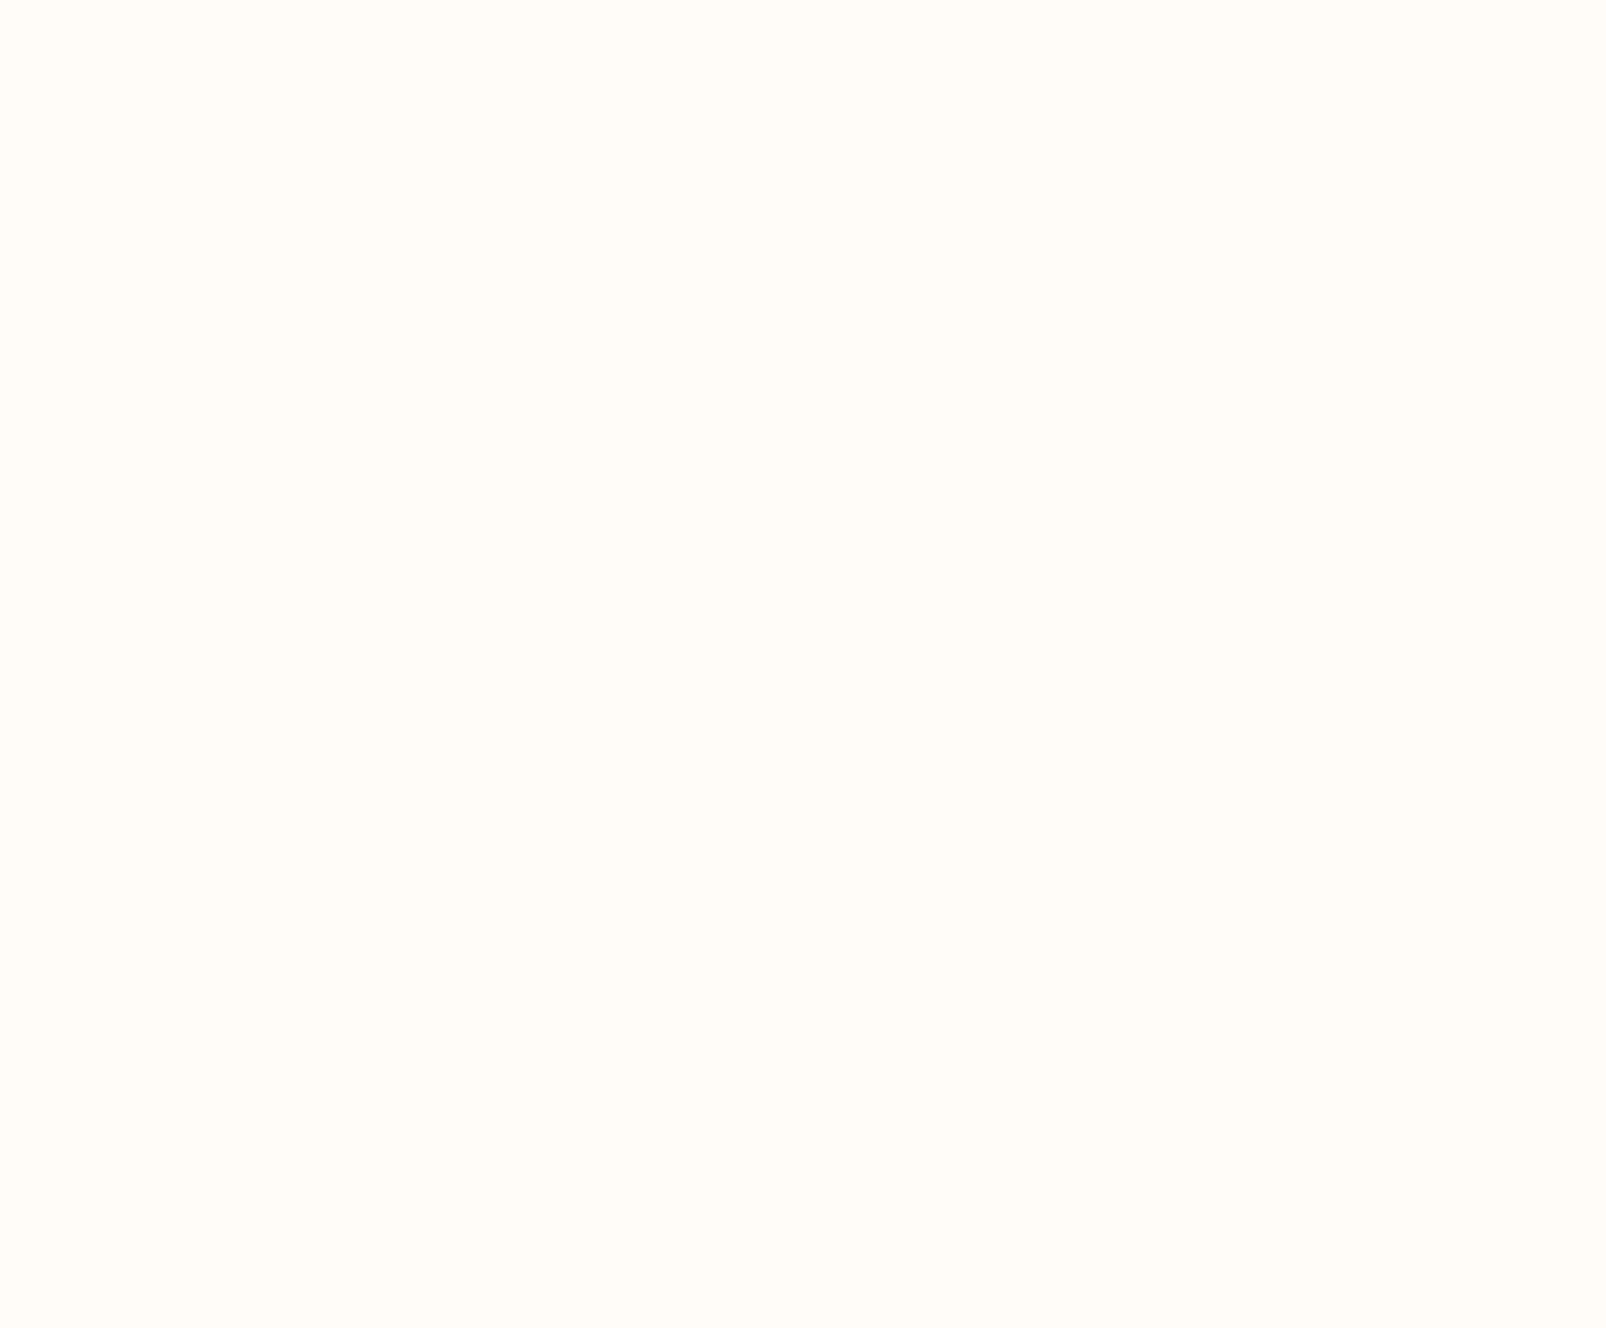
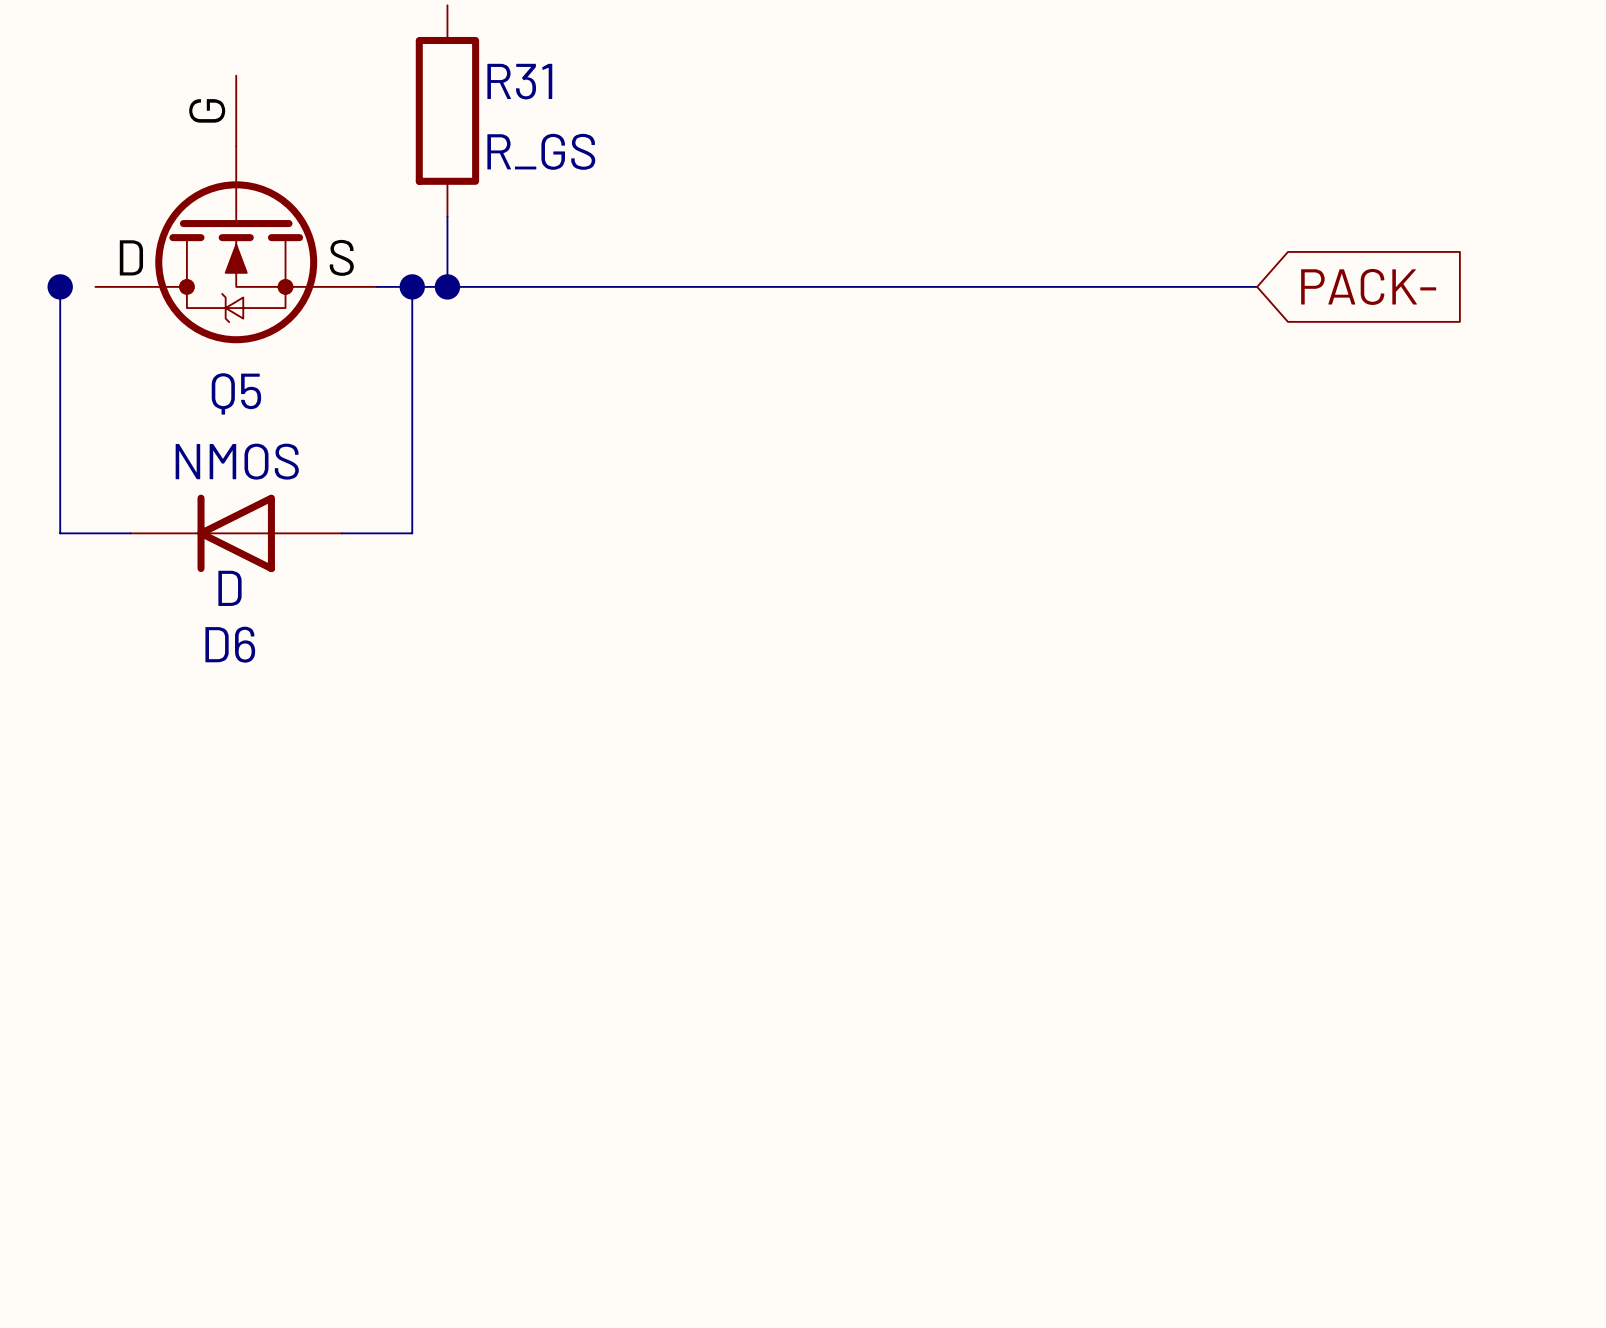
R31: none -> R_GS (447, 110)
Q5: none -> NMOS (236, 209)
wire: none -> (447, 216) (447, 286)
wire: none -> (60, 286) (60, 533) (130, 533)
junction: none -> (60, 286)
wire: none -> (377, 286) (1257, 286)
wire: none -> (412, 286) (412, 533) (341, 533)
junction: none -> (412, 286)
junction: none -> (447, 286)
global label: none -> PACK- (1368, 286)
D6: none -> D (236, 533)

